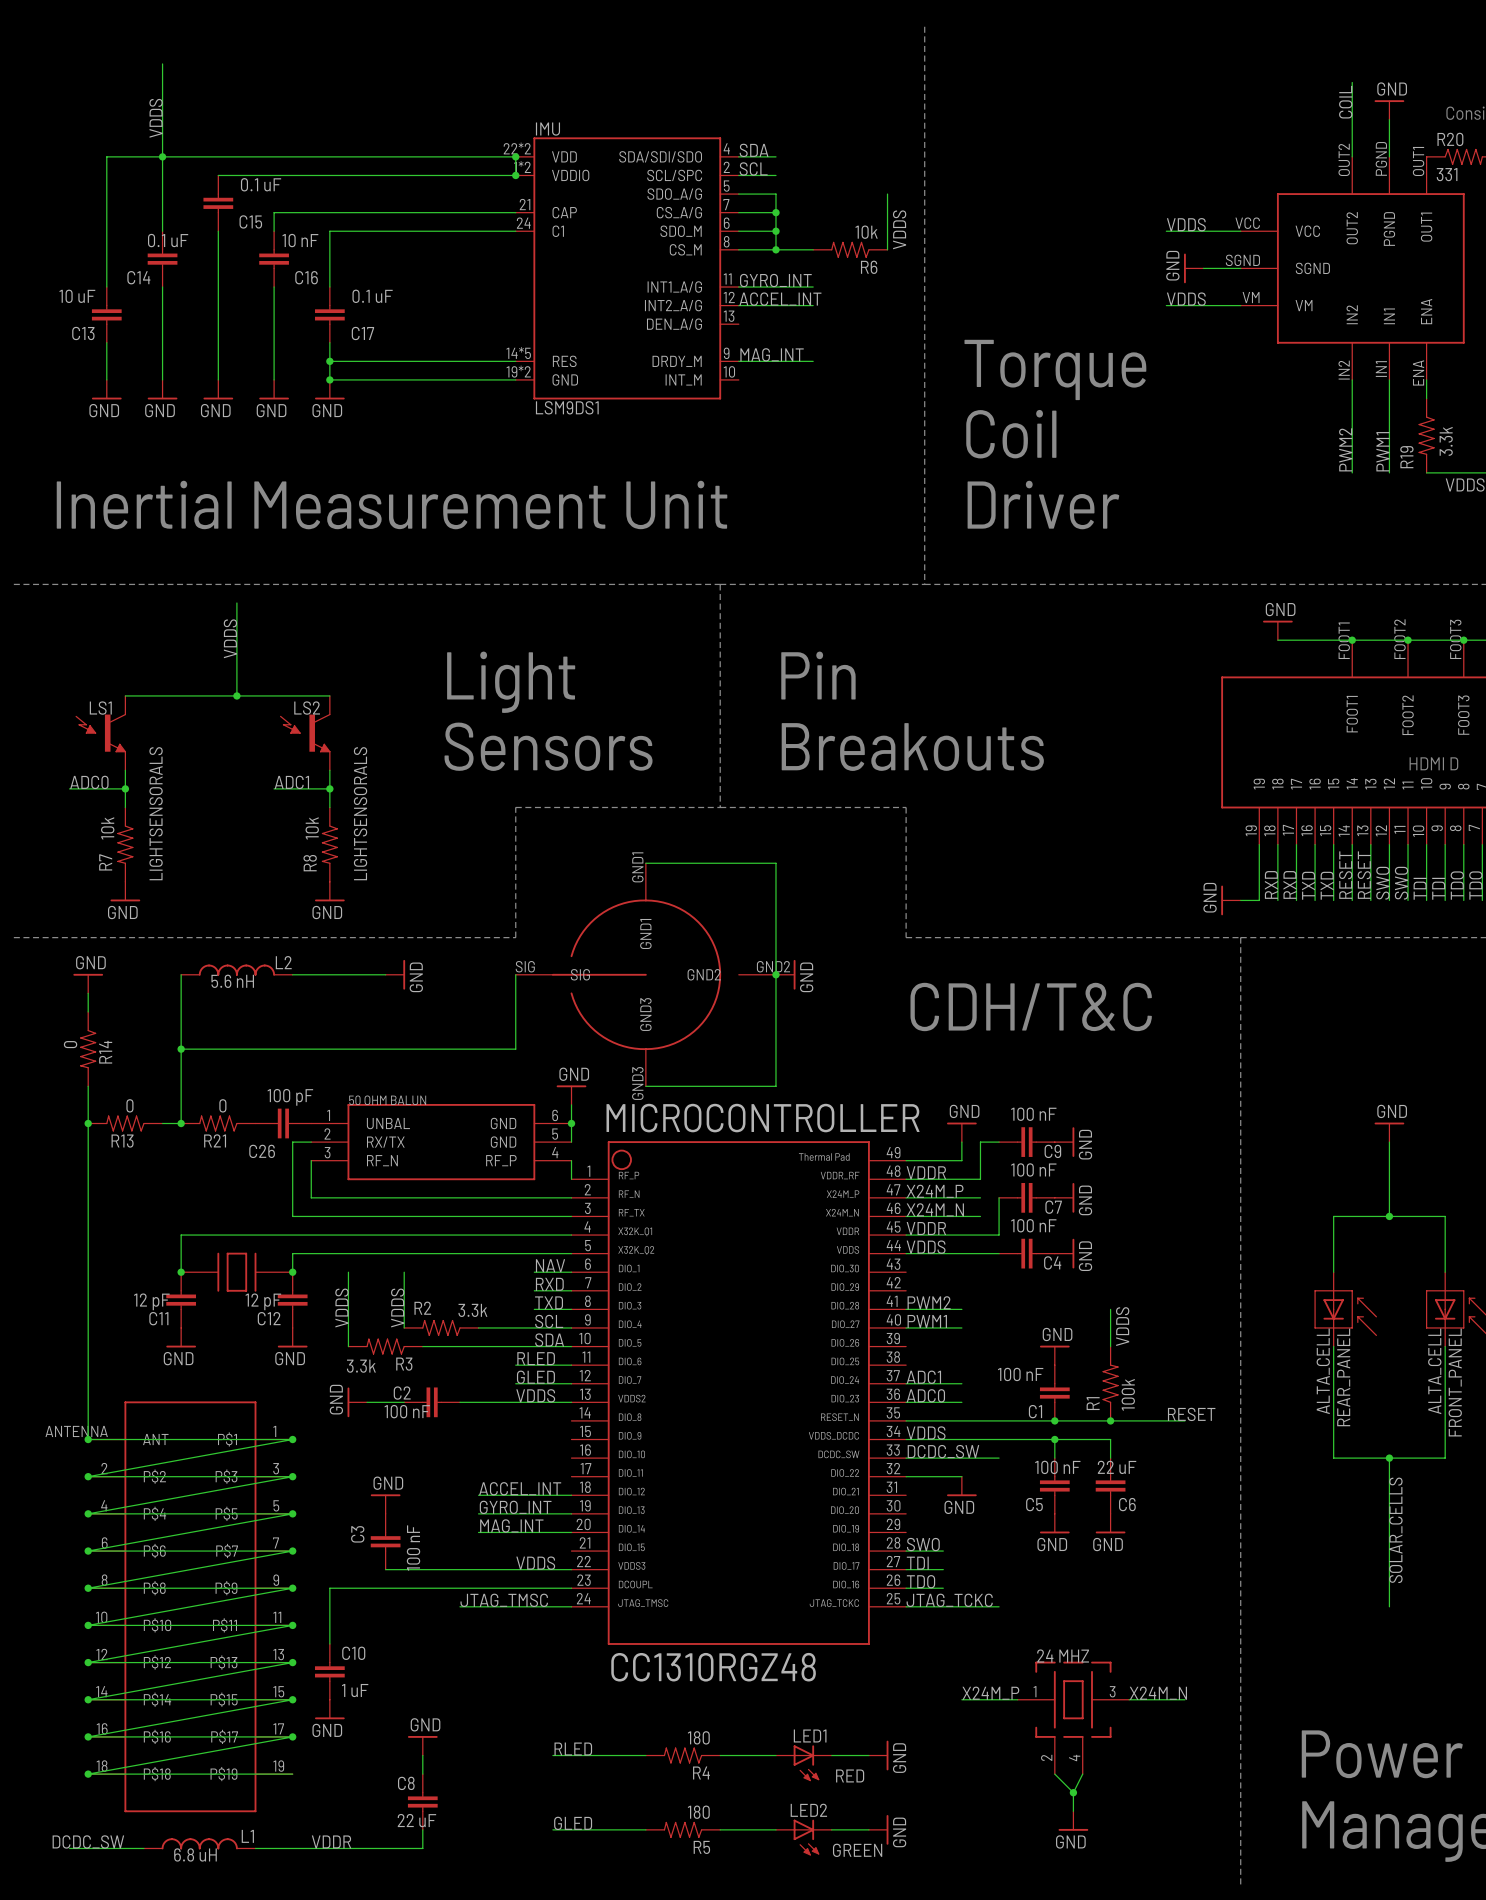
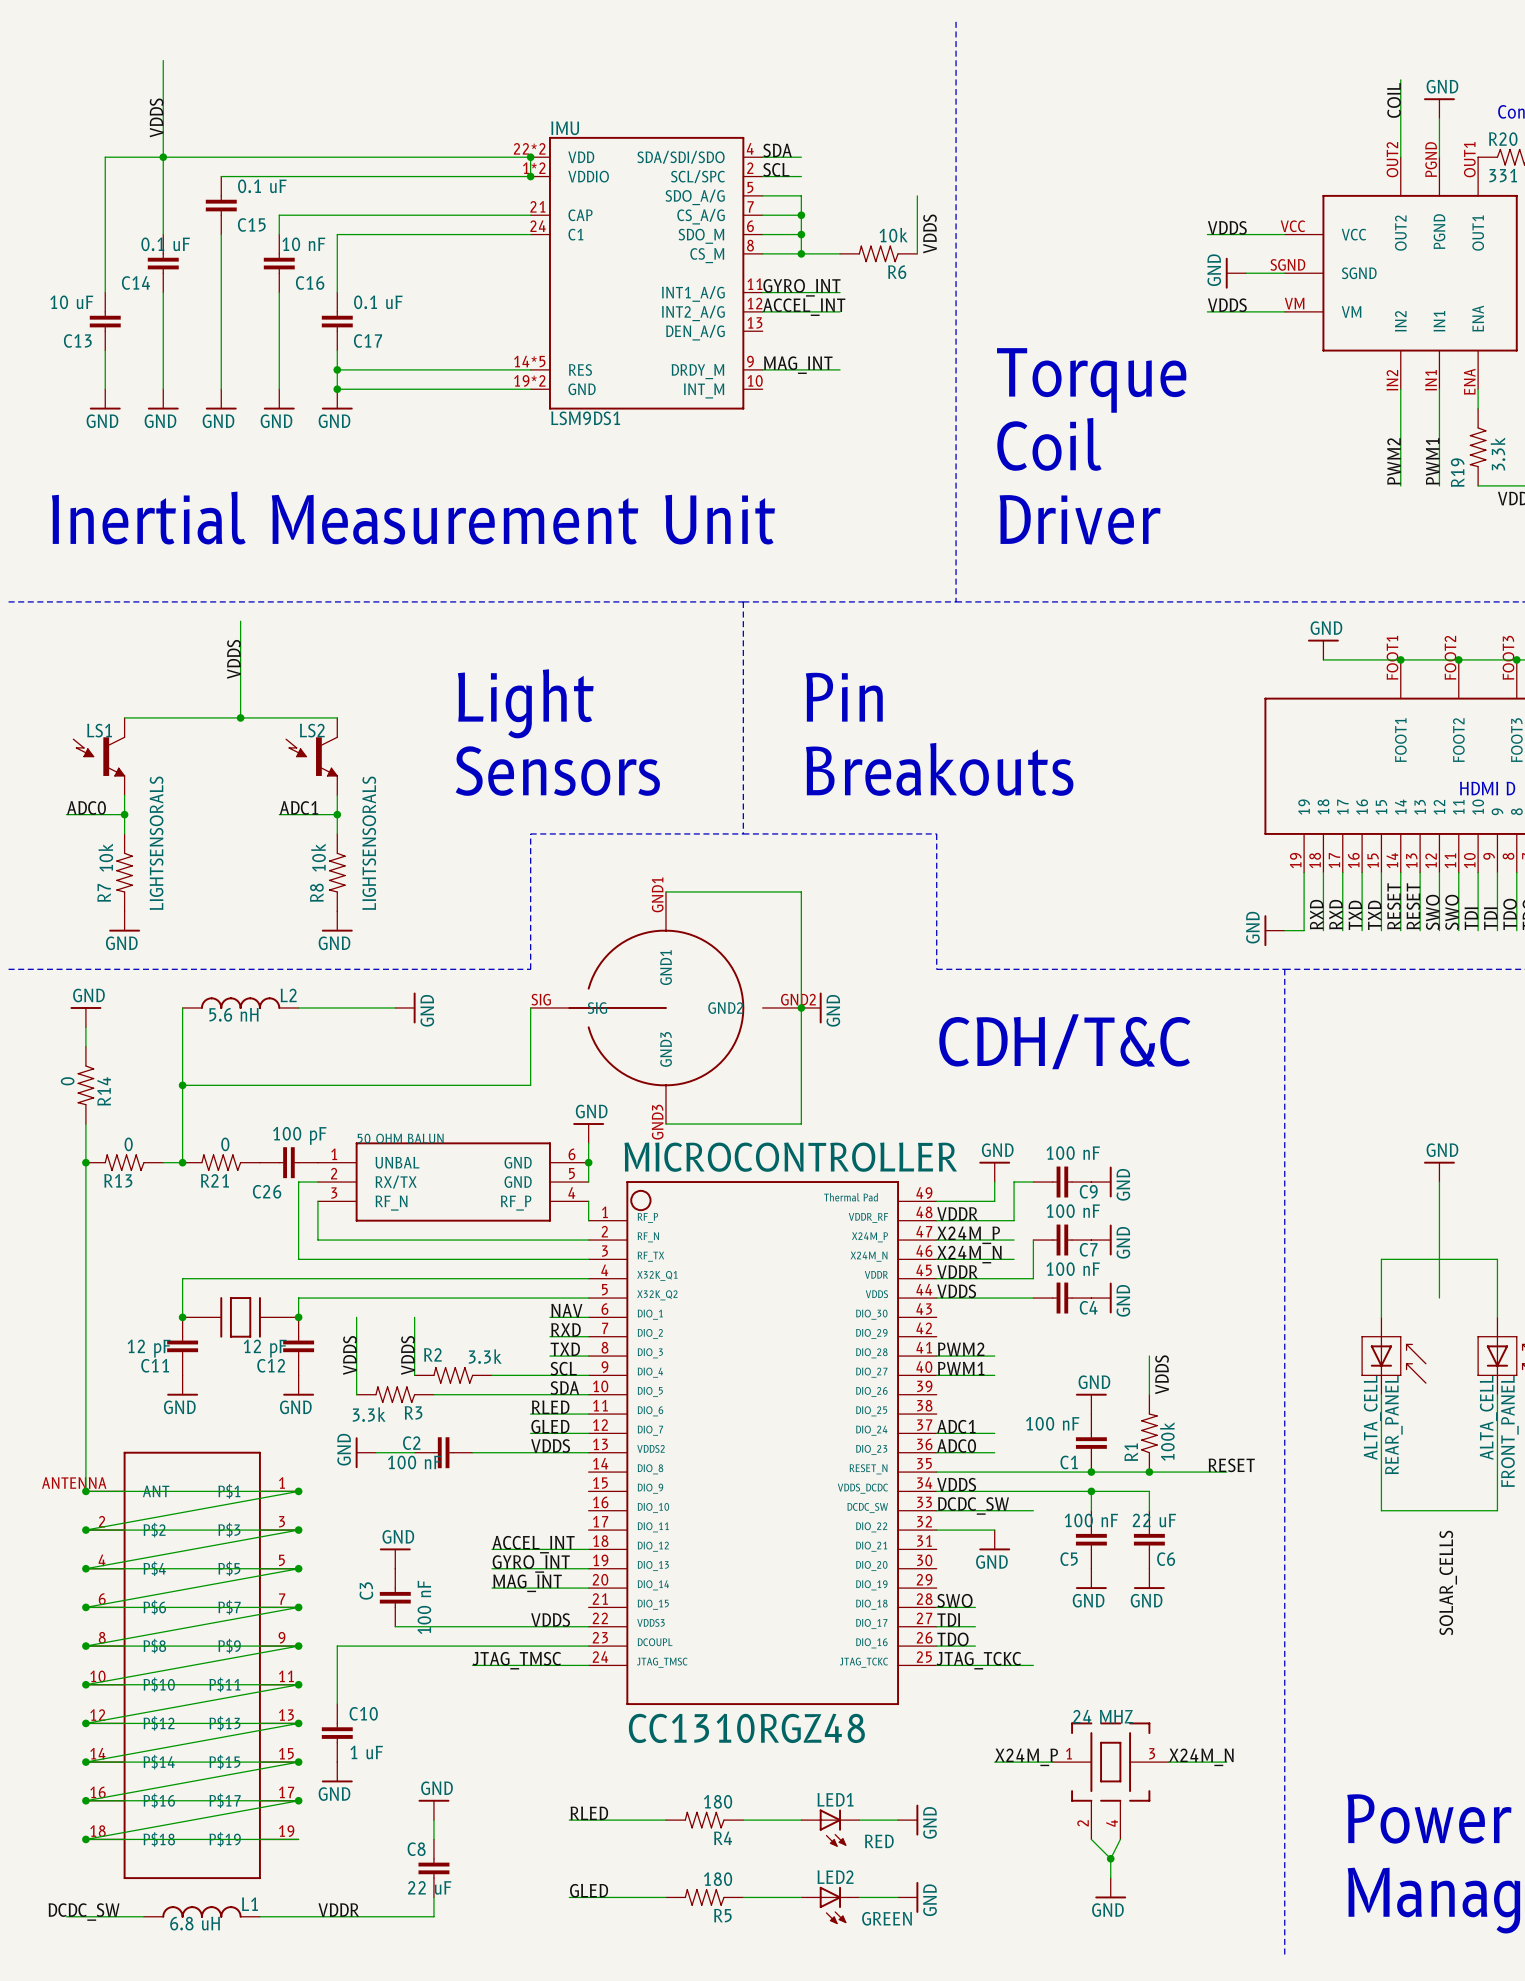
wire: none -> (1439, 1259) (1439, 1298)
junction: (1389, 1216) -> none
wire: (1389, 1458) (1389, 1606) -> none
junction: (1389, 1458) -> none

